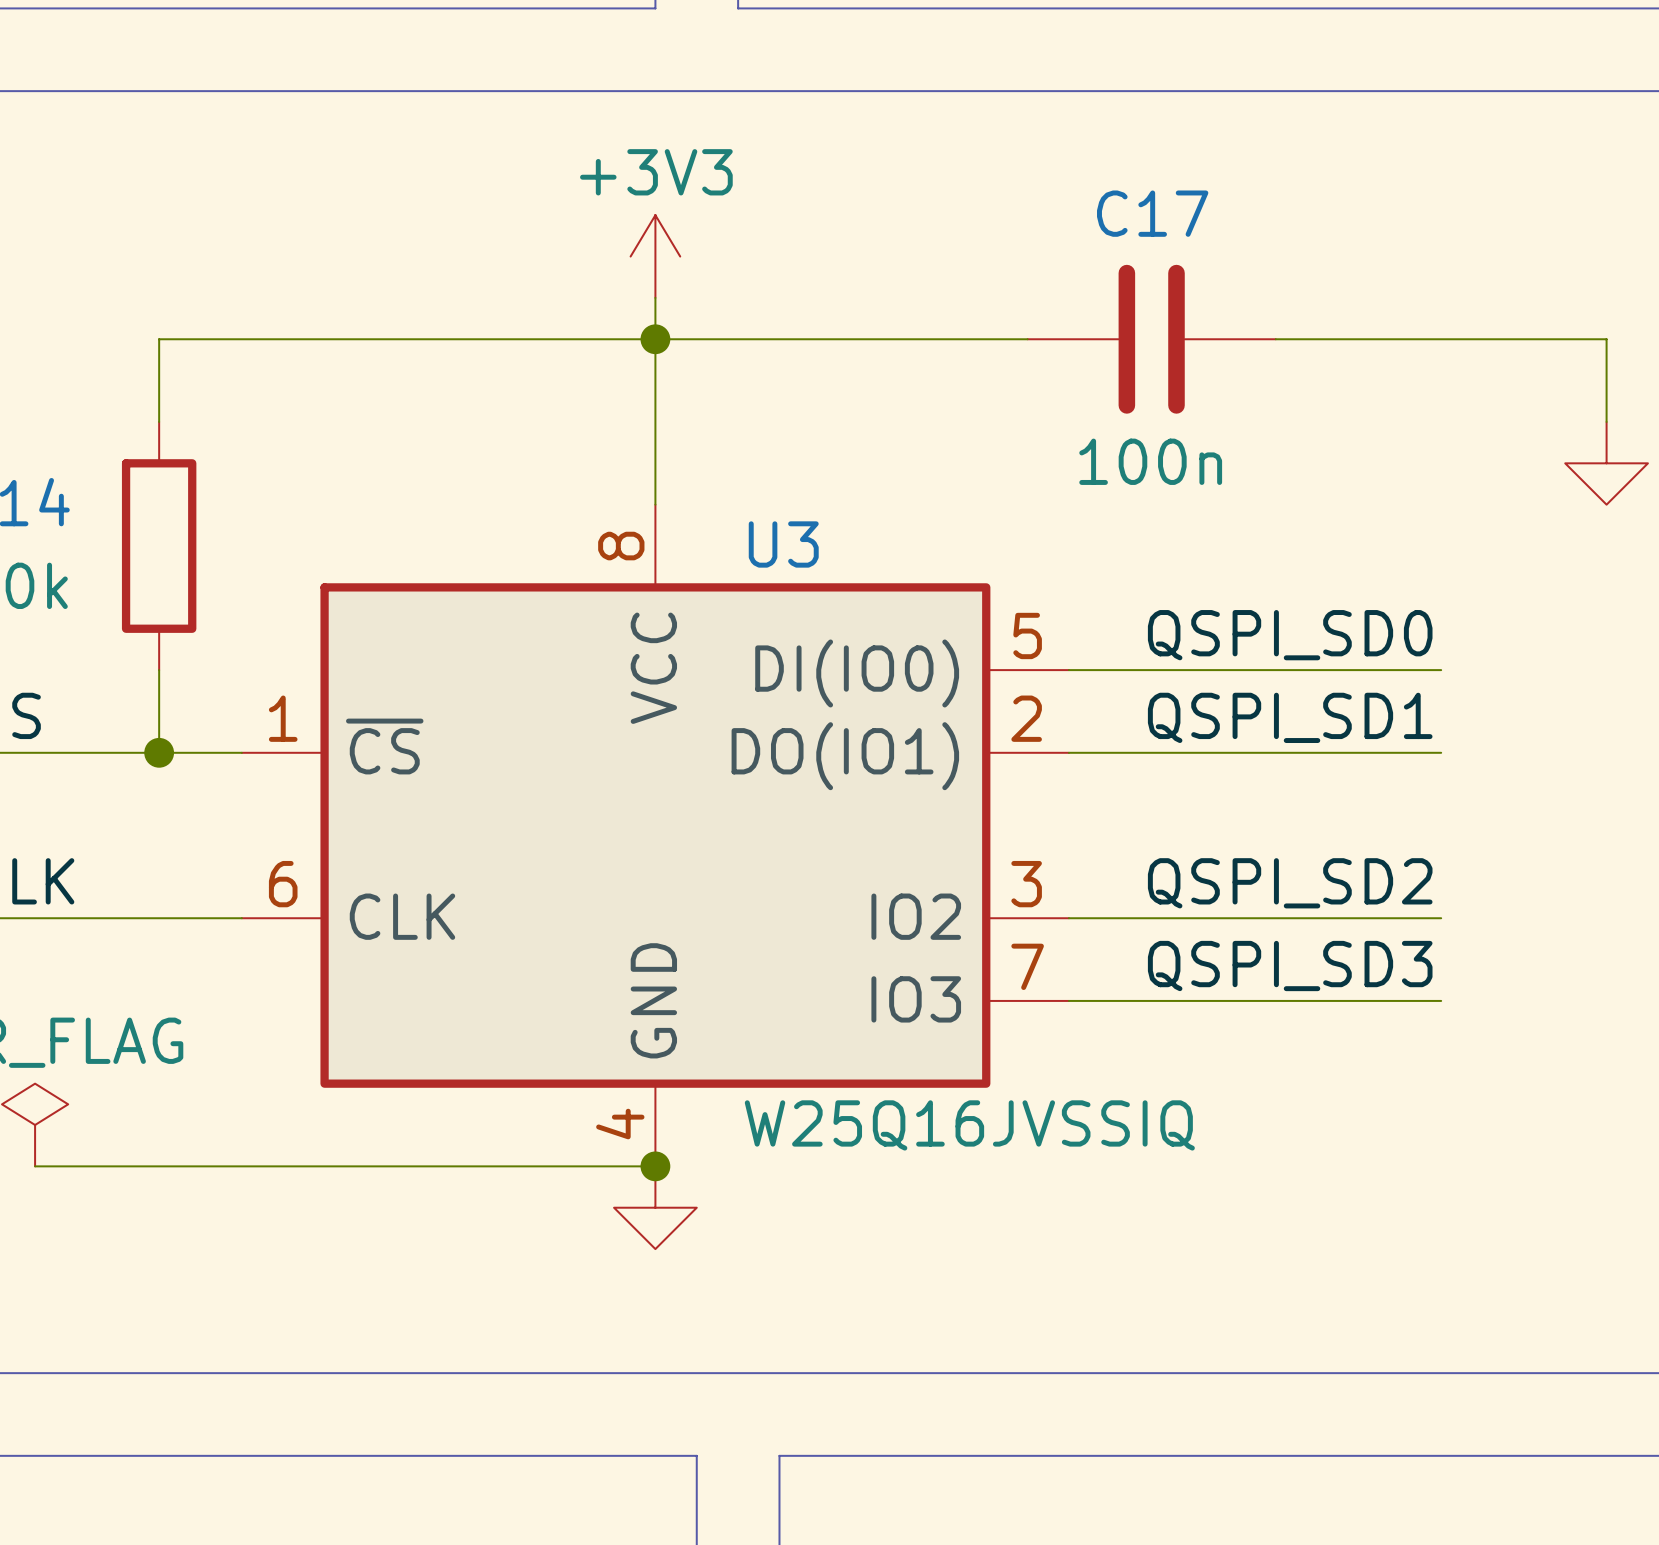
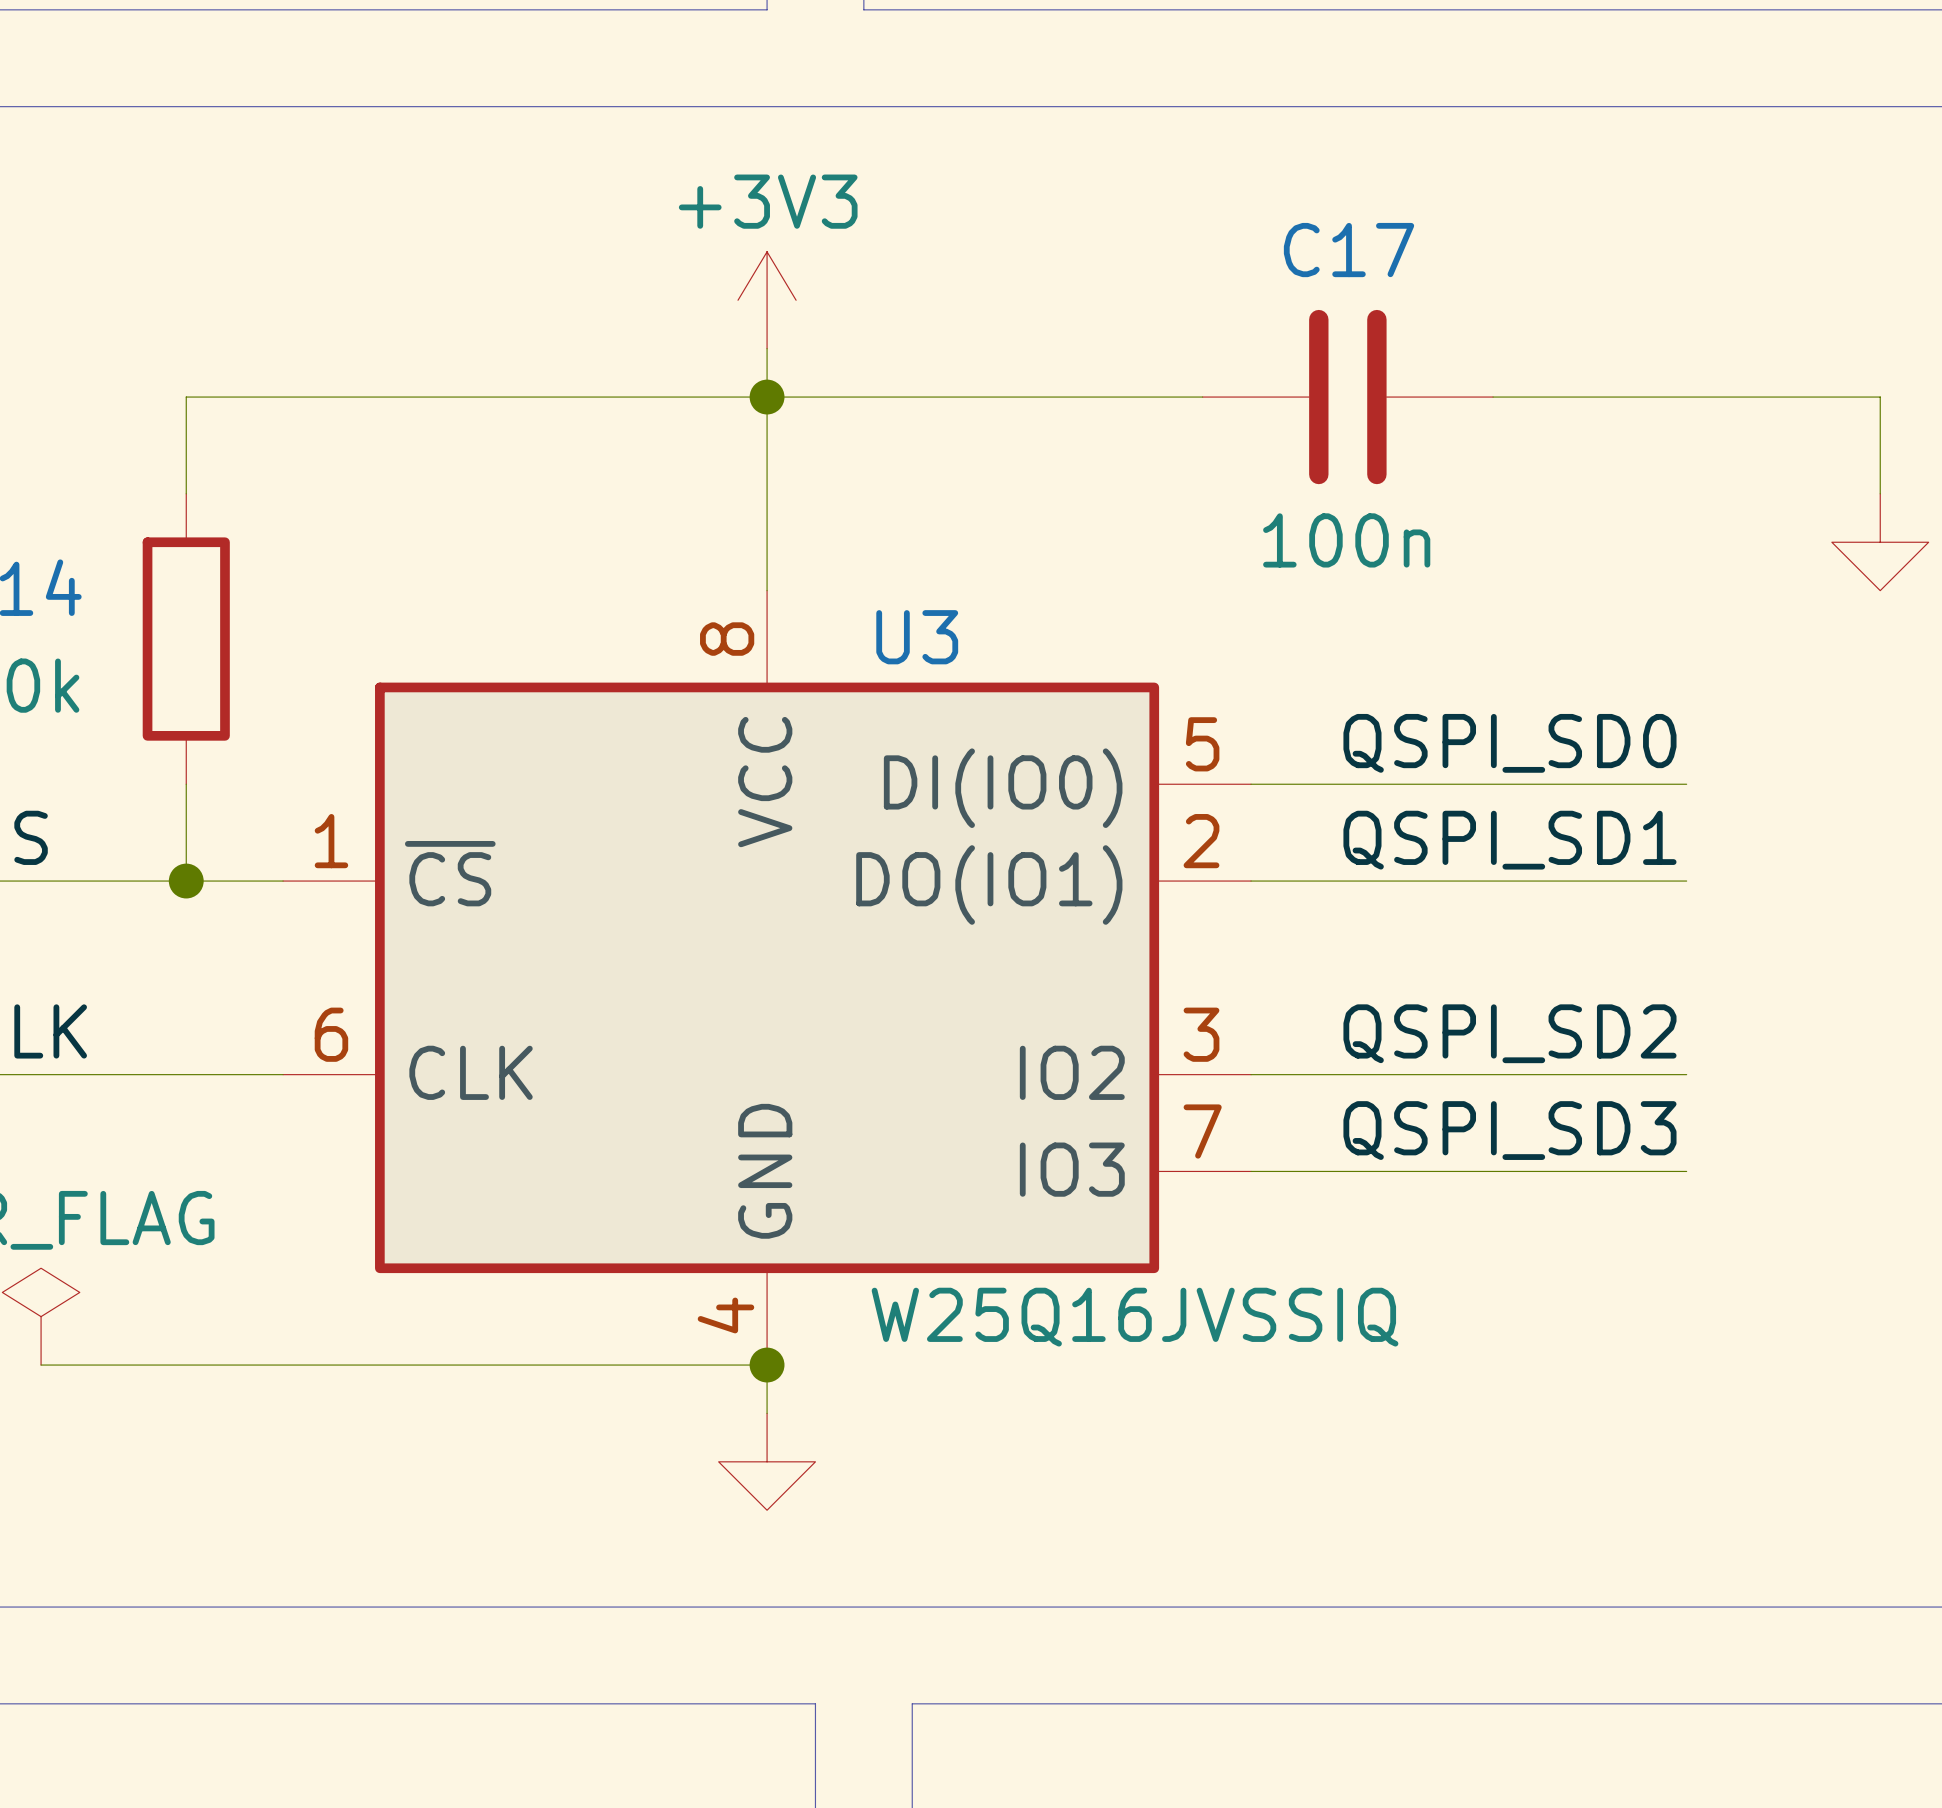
power symbol position: (655, 1207) -> (767, 1461)

